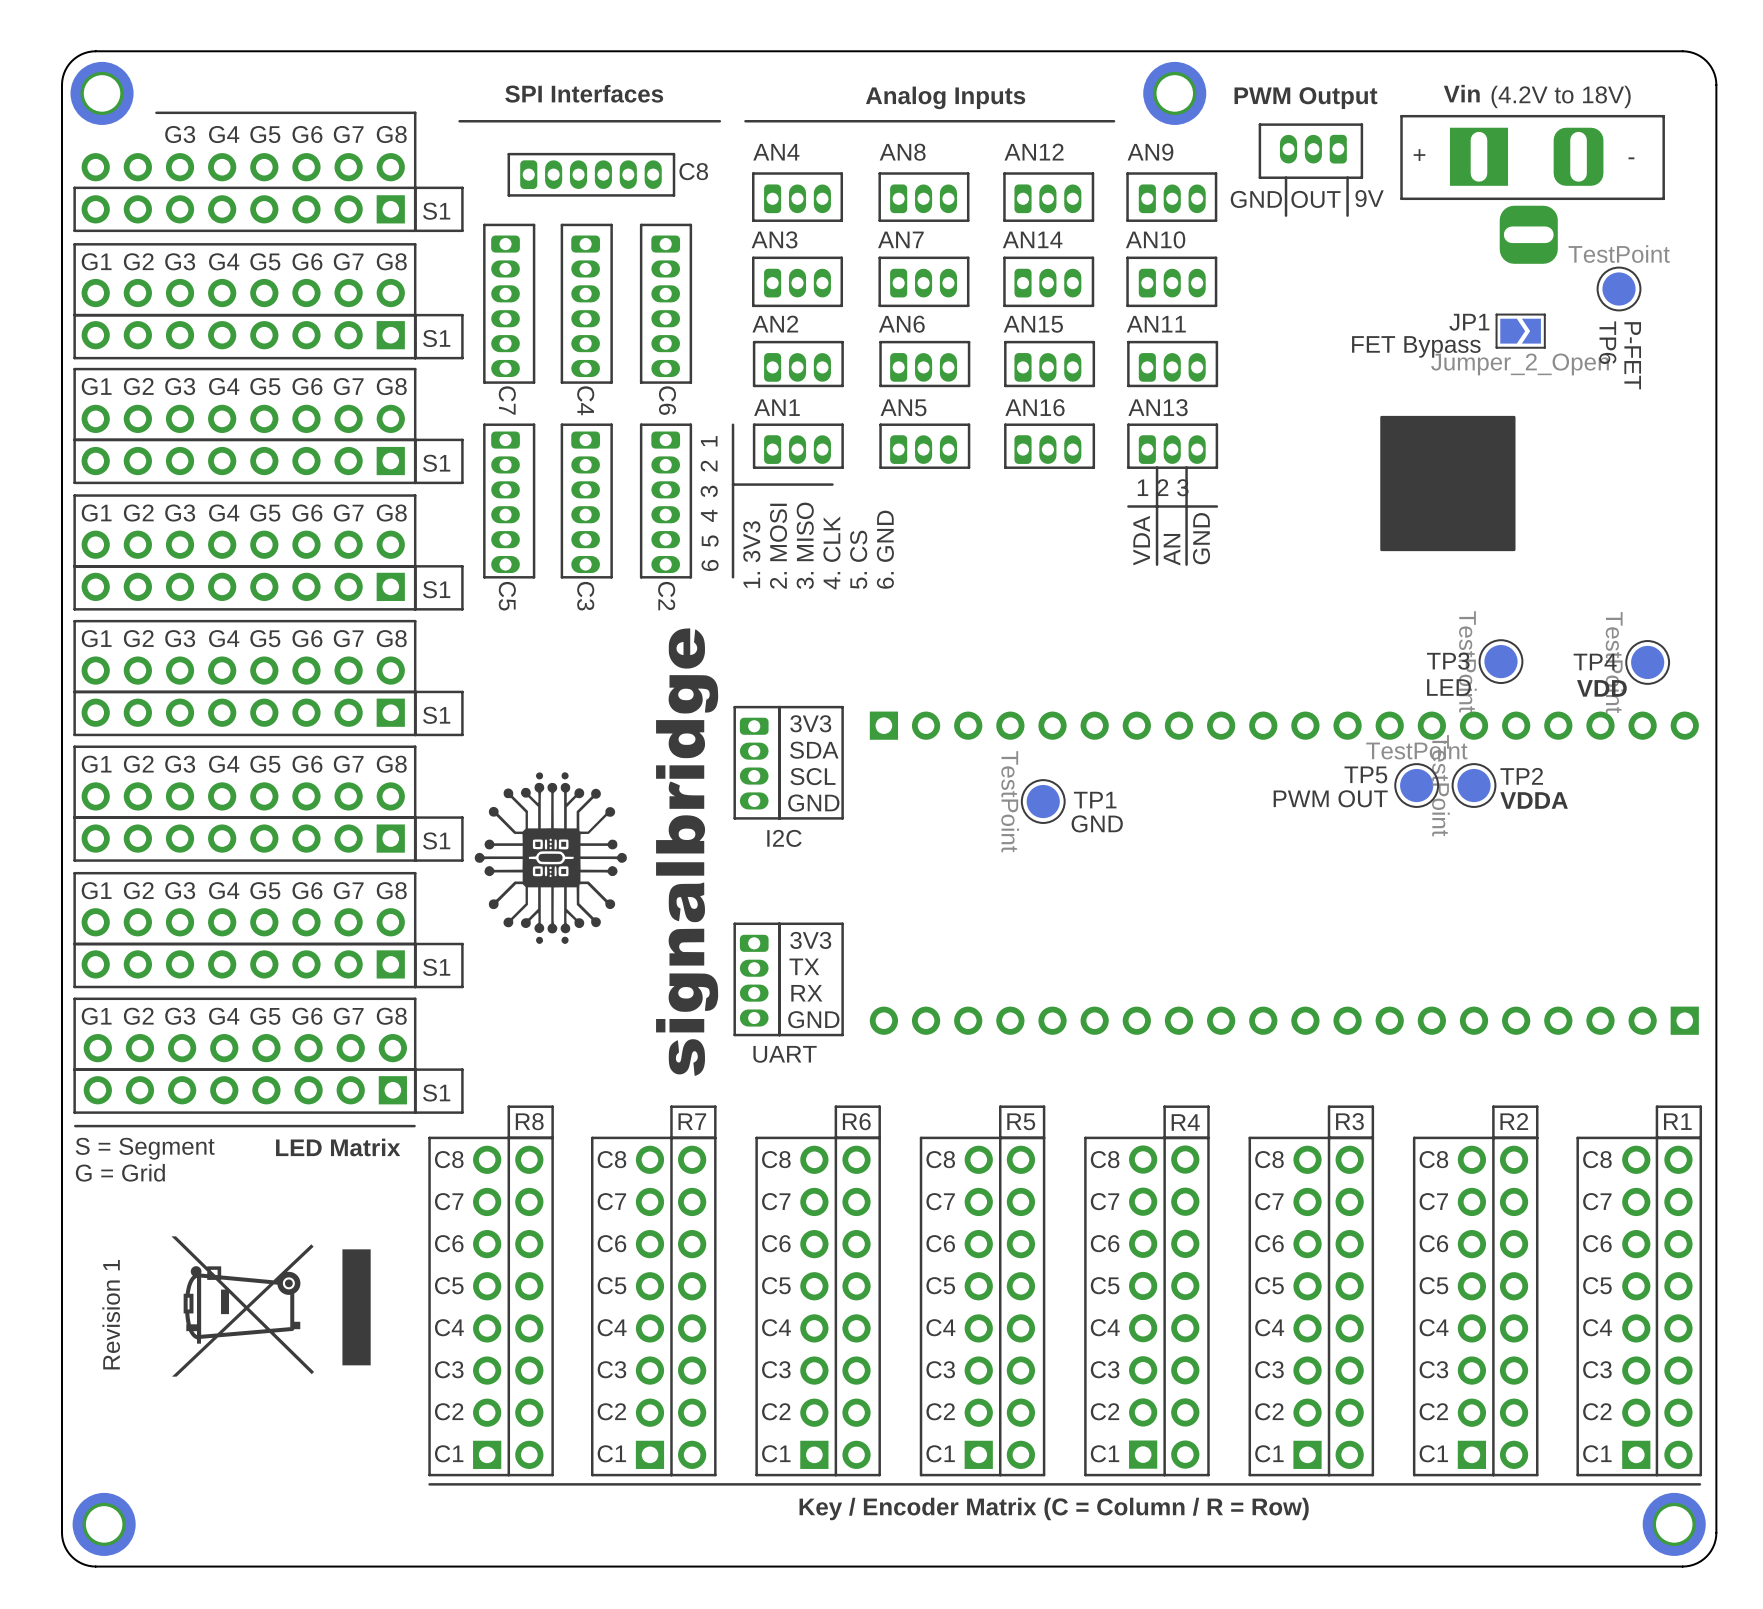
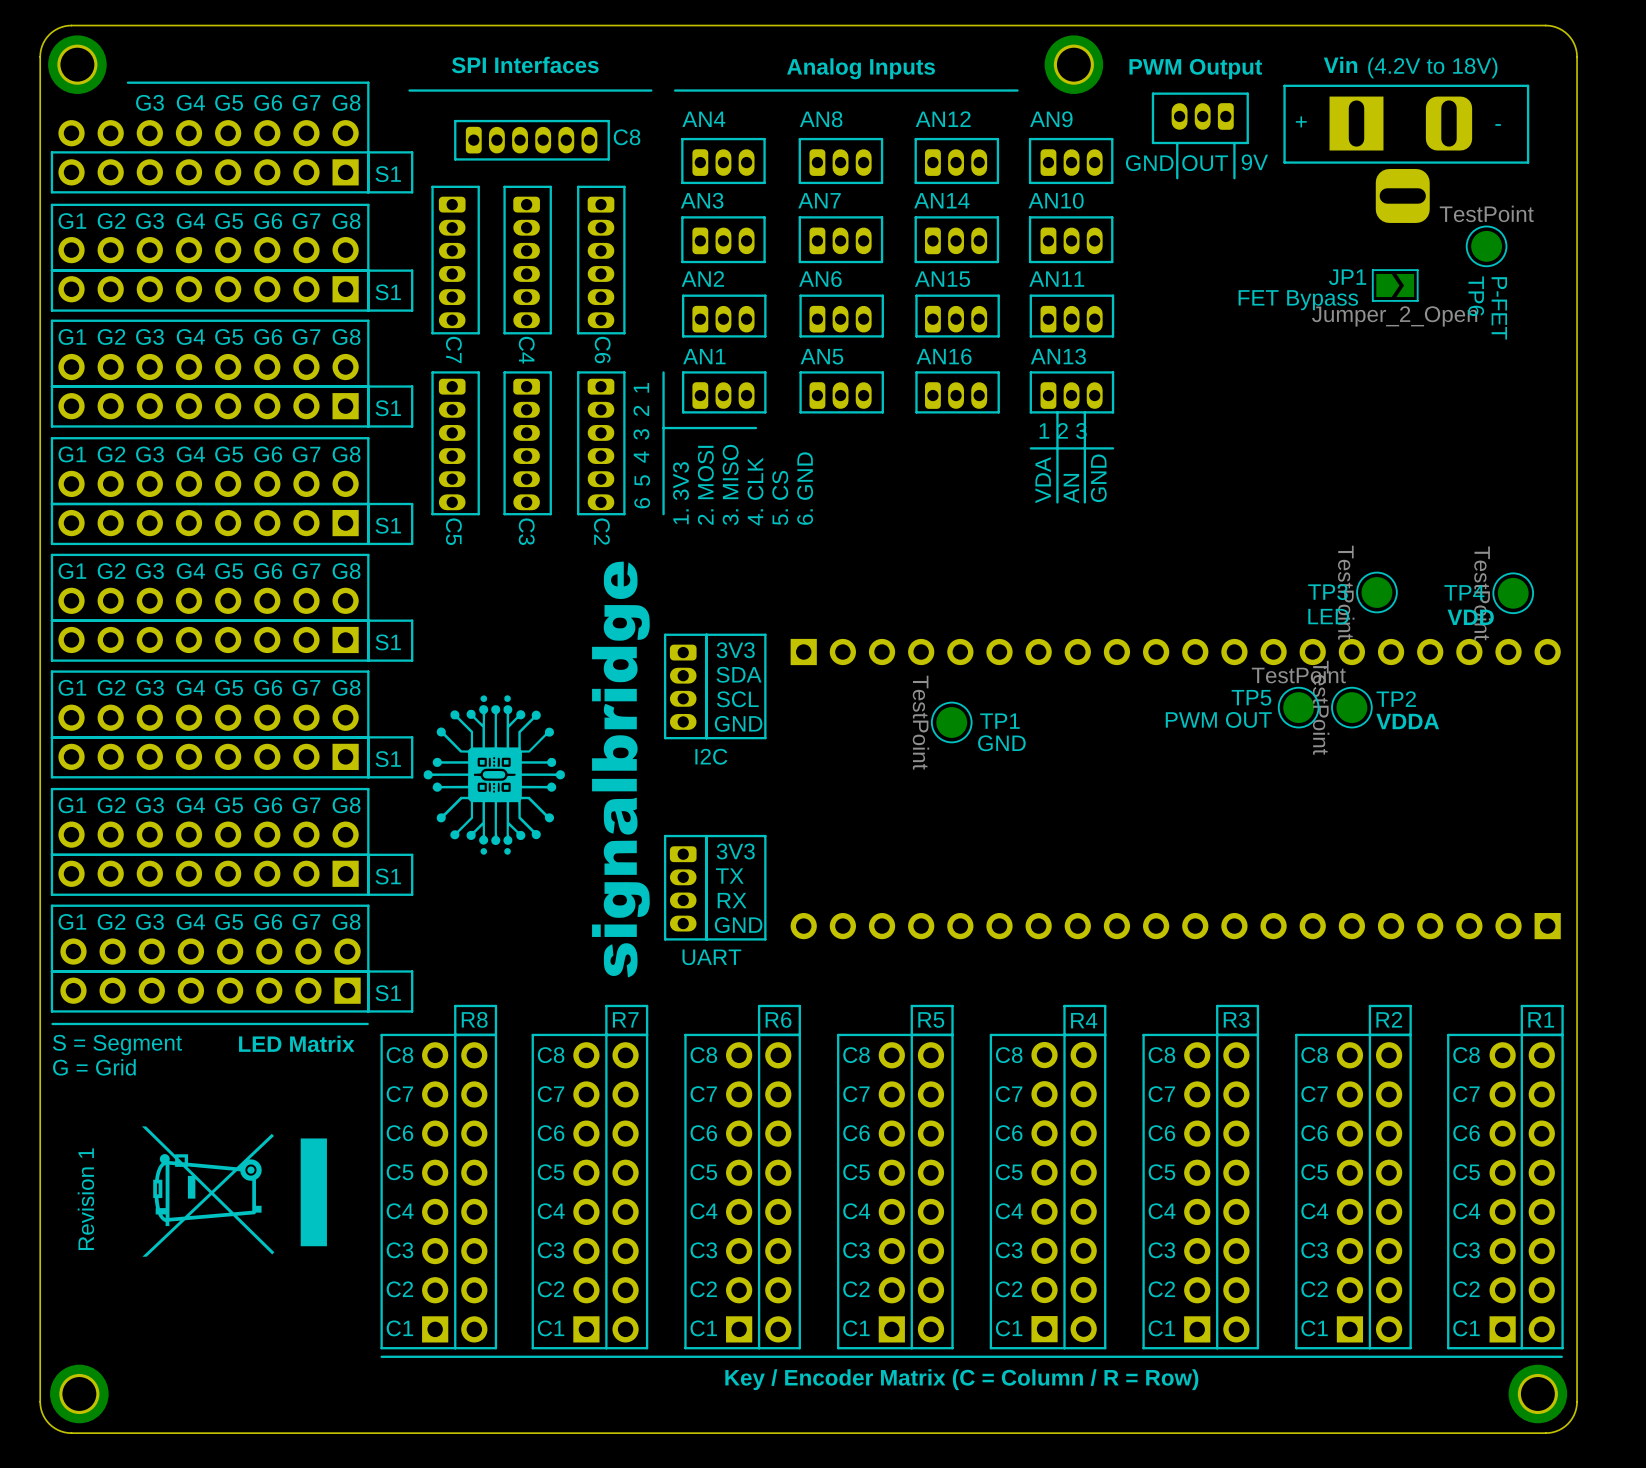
drawing: [1380, 415, 1516, 552] -> none

